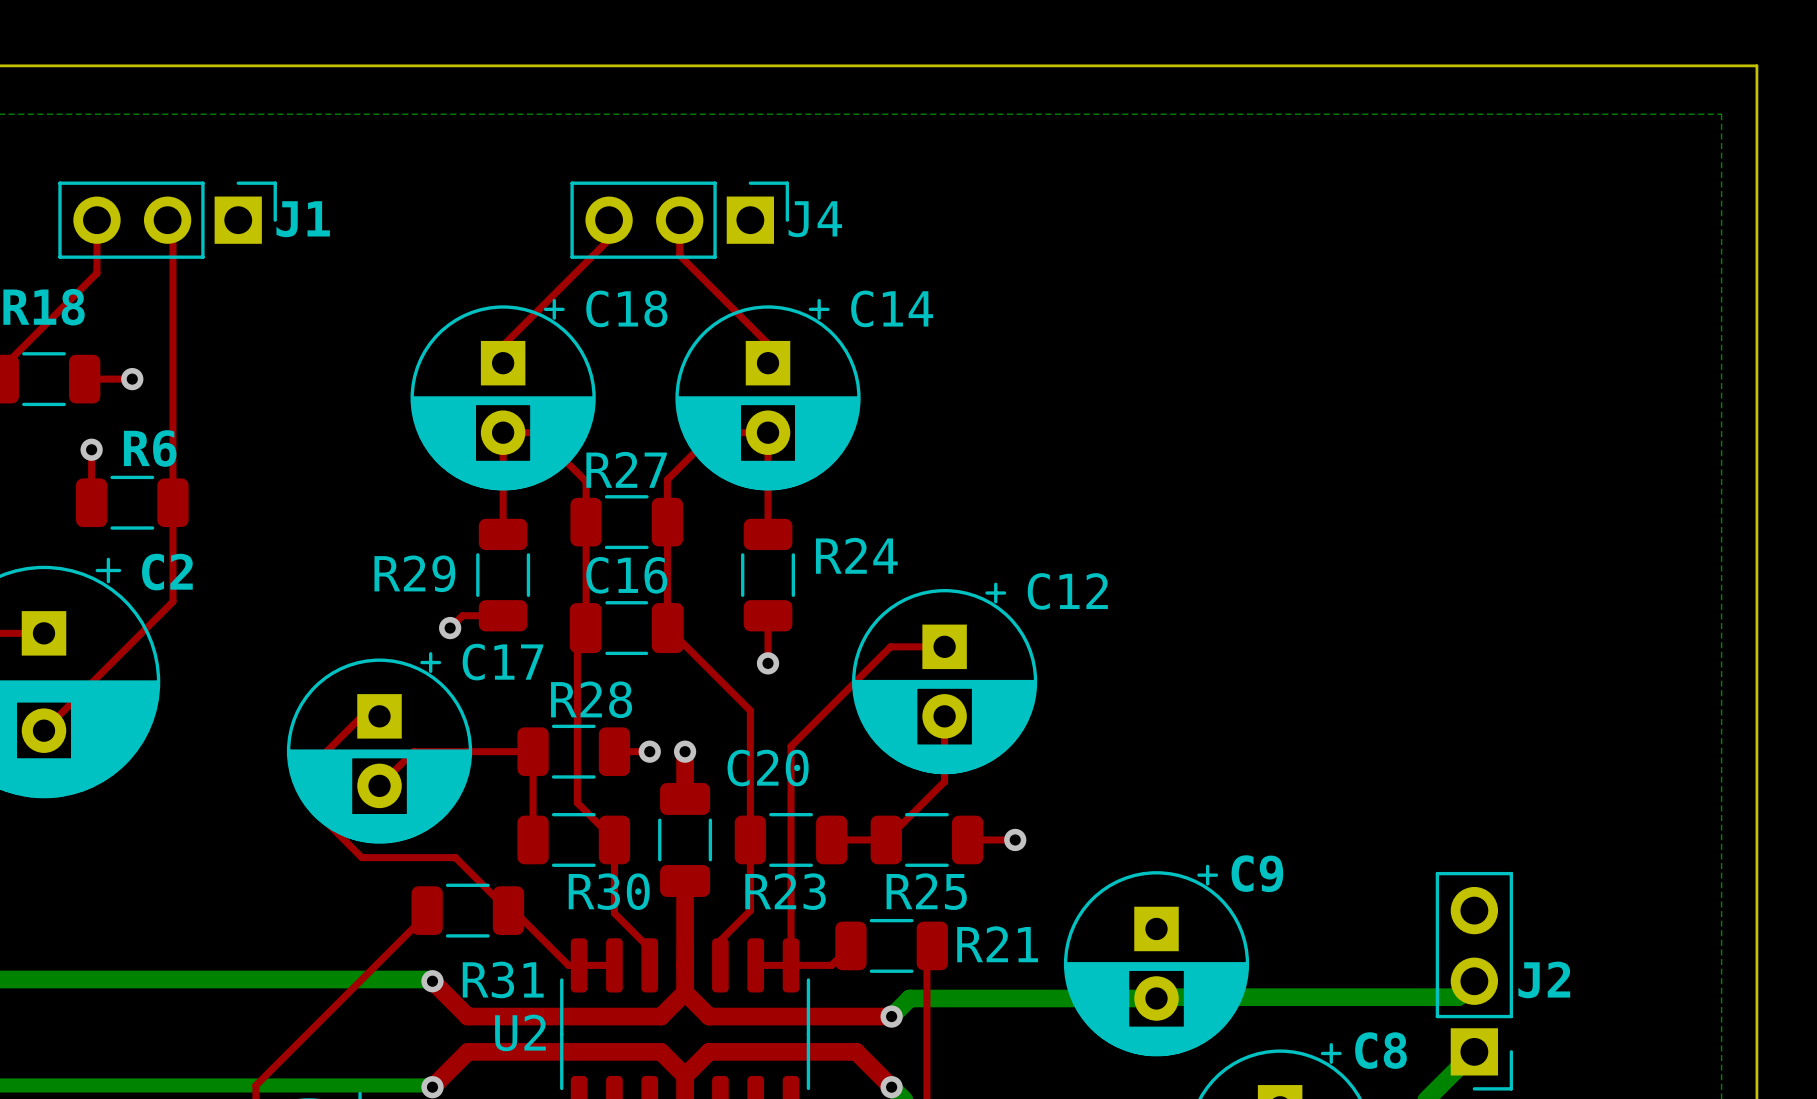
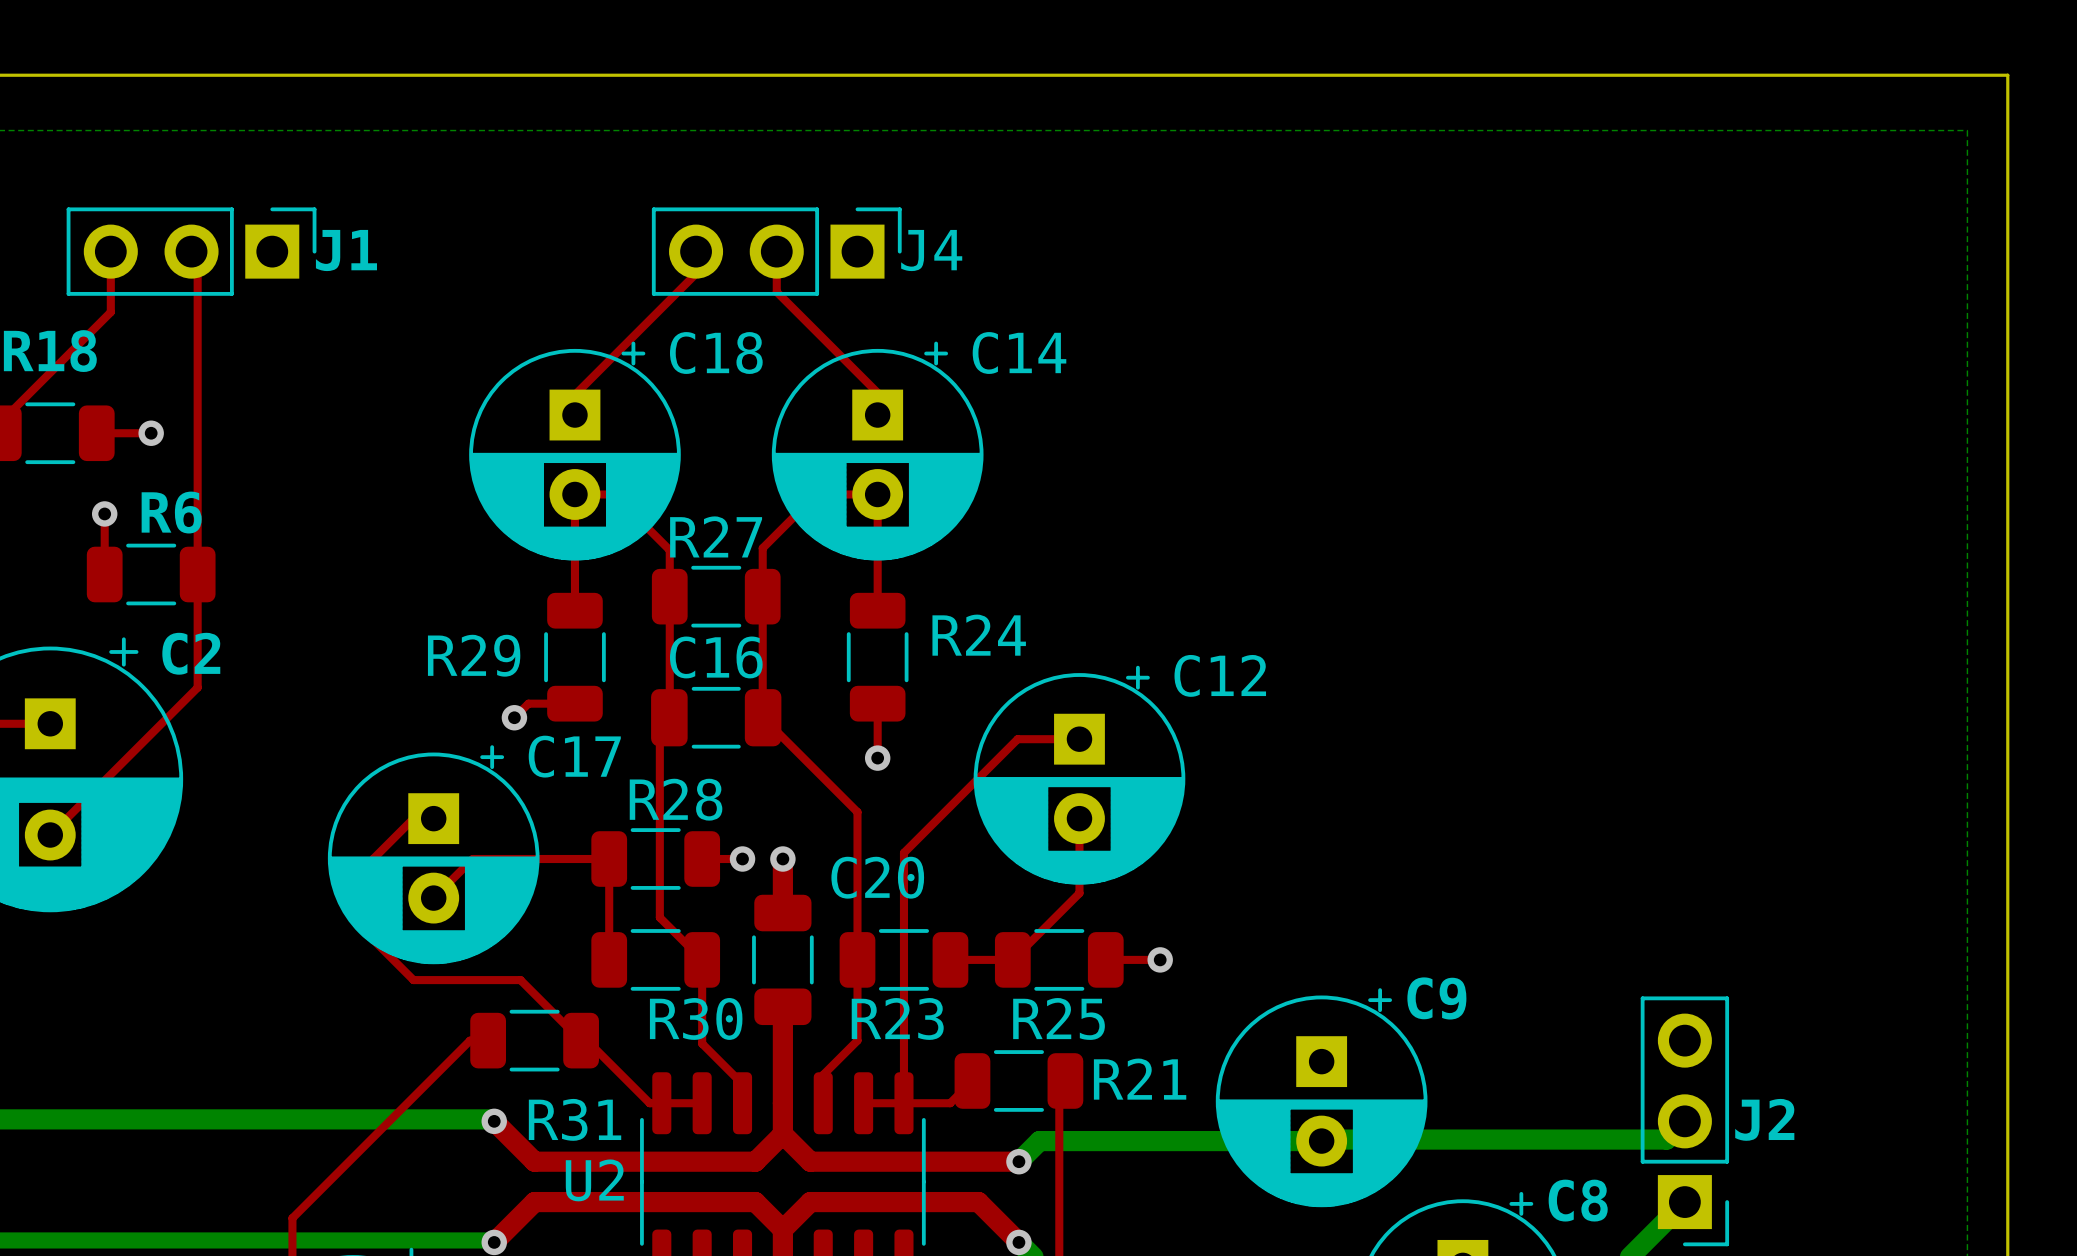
top track: (427, 914) (255, 1085) -> (488, 1040) (470, 1040) (292, 1218) (292, 1240)

